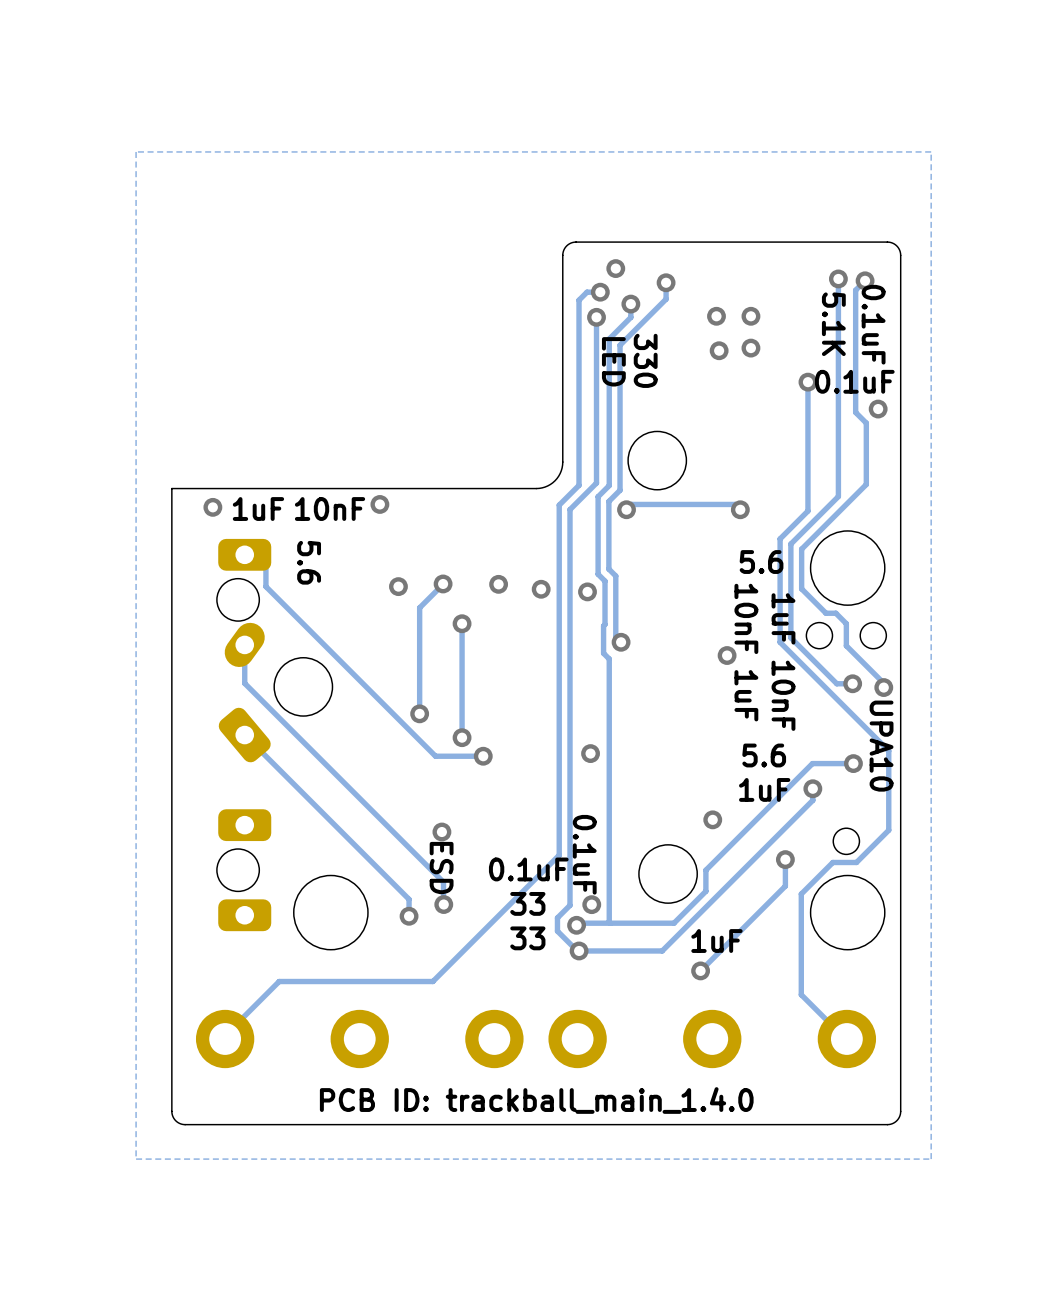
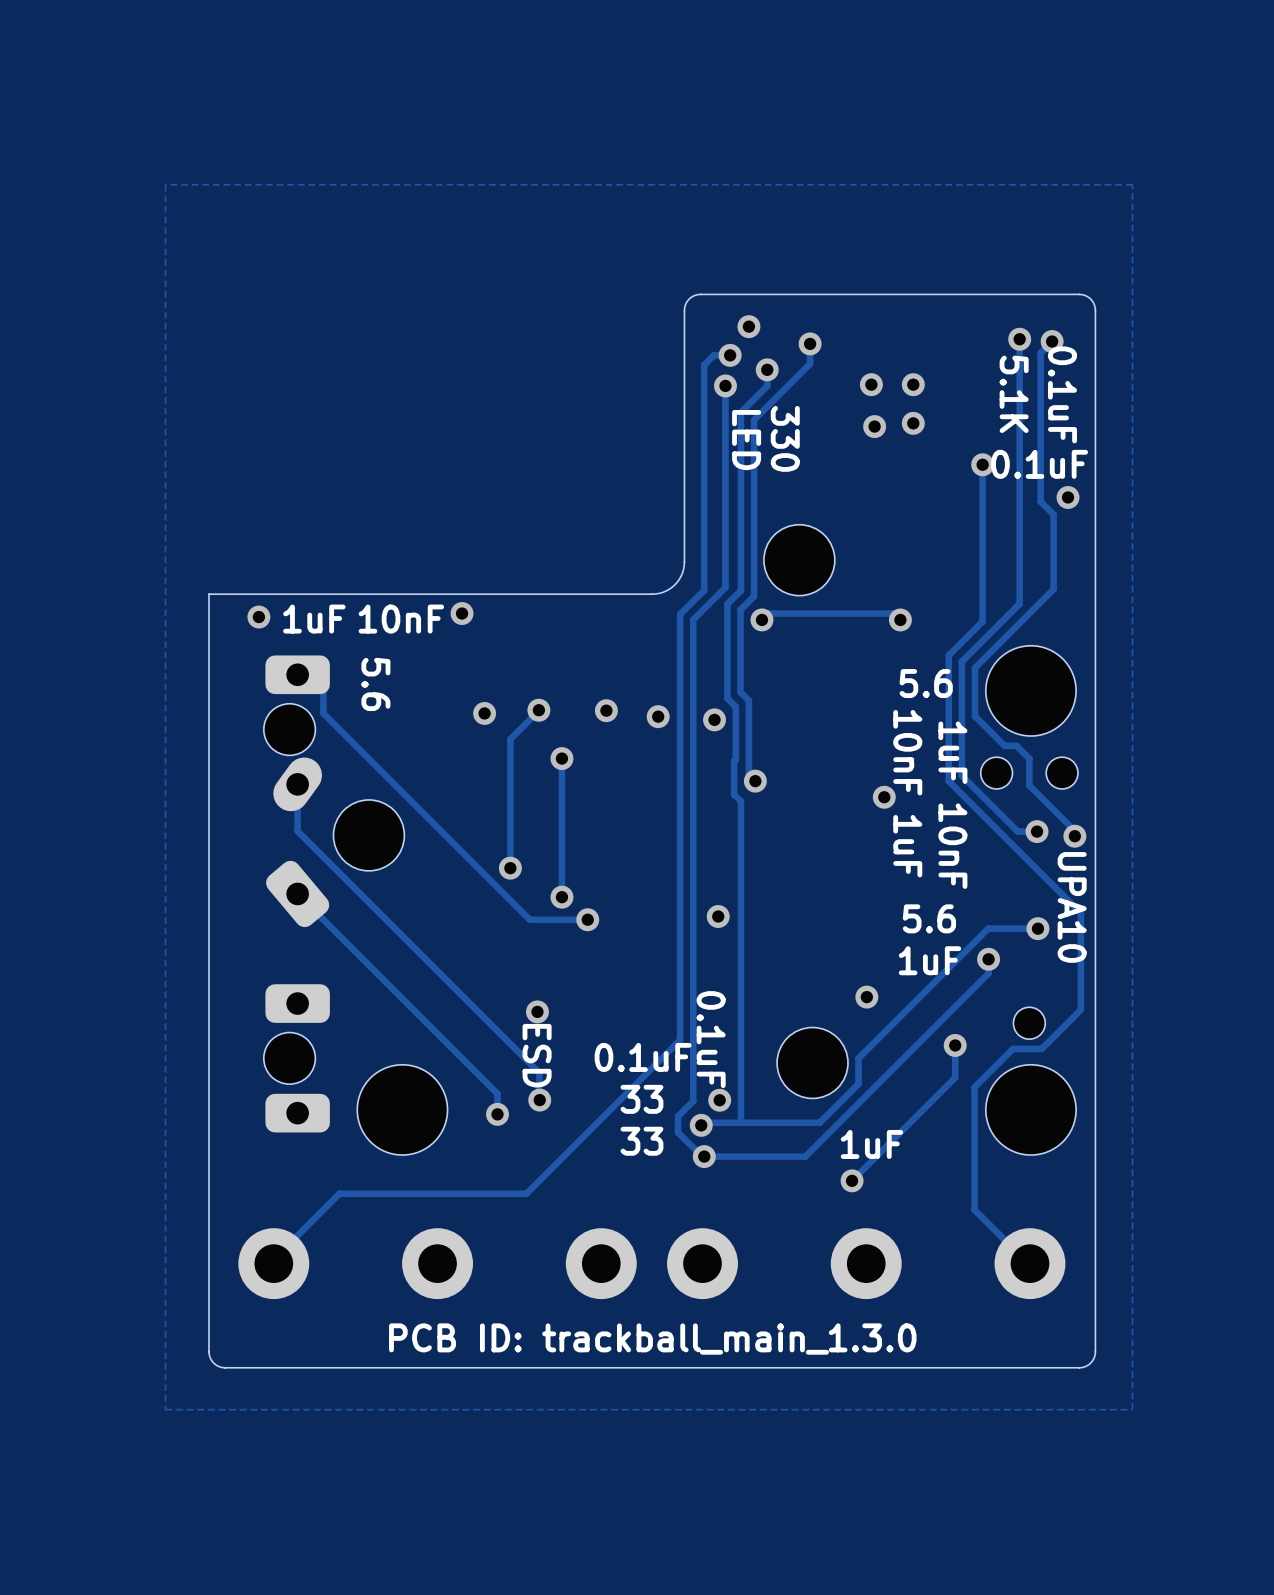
text: PCB ID: trackball_main_1.4.0 (536, 1100) -> PCB ID: trackball_main_1.3.0 (652, 1339)

